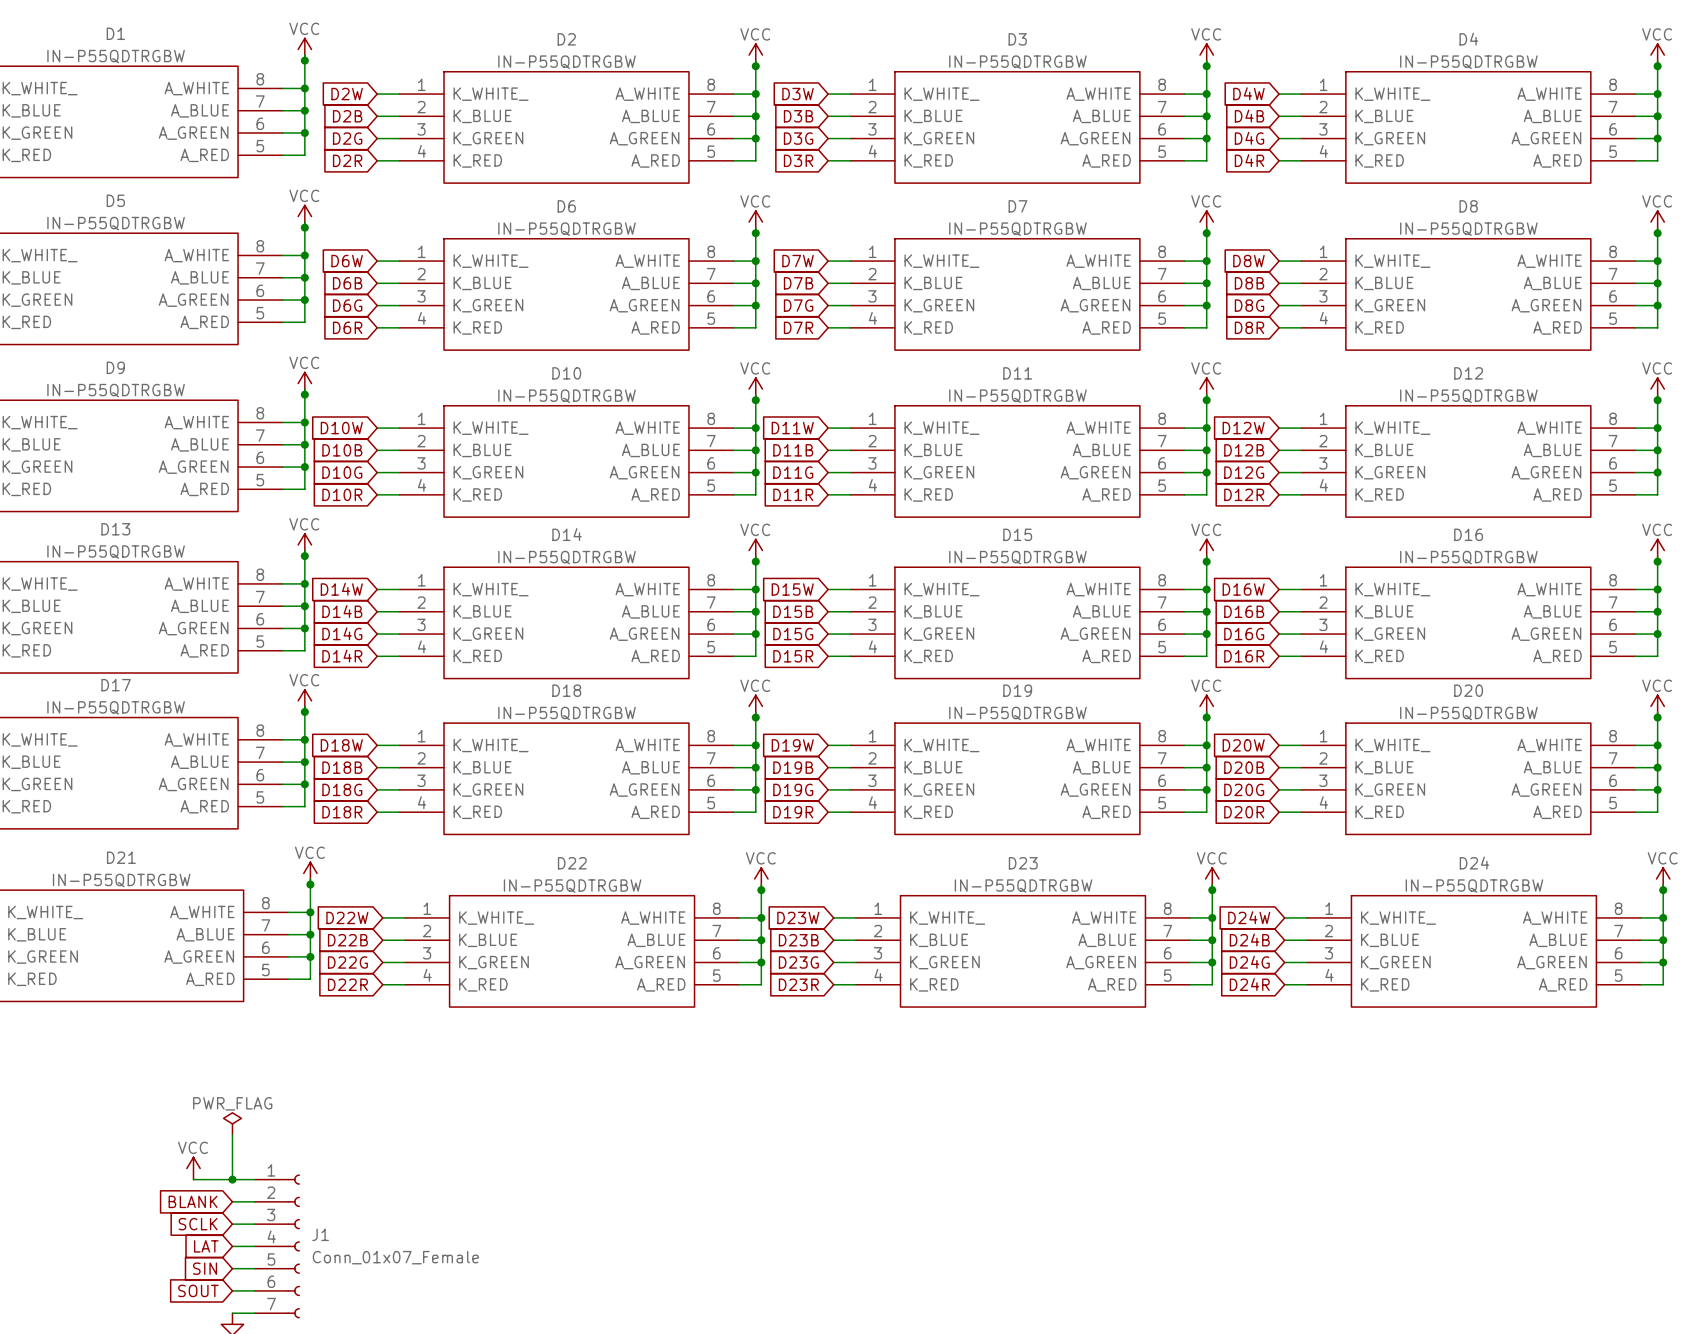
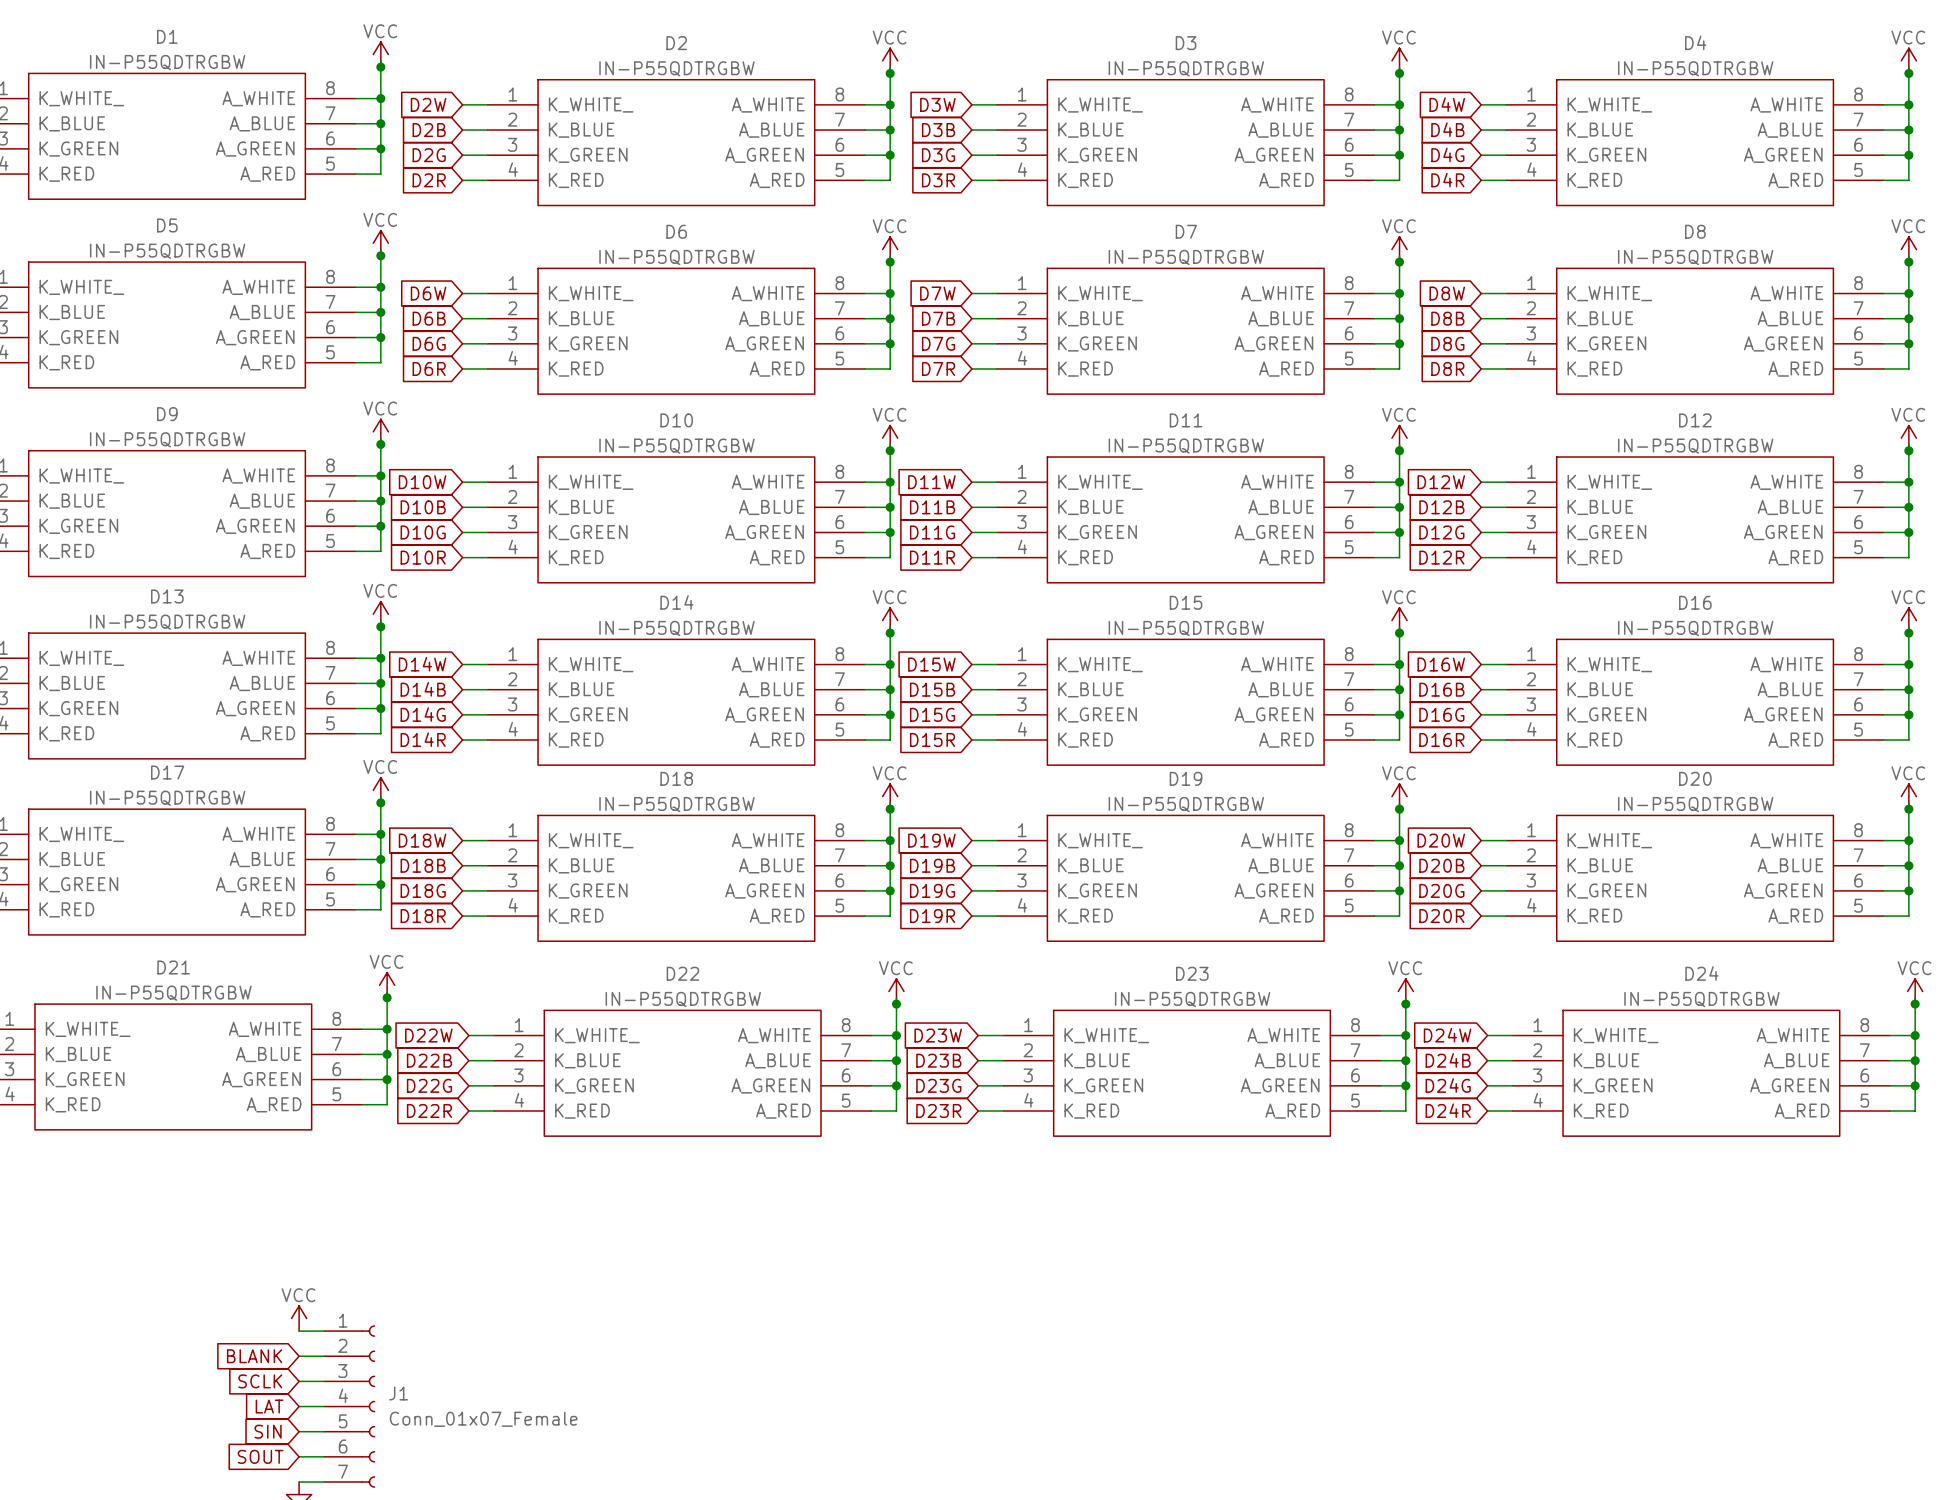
power symbol: PWR_FLAG (232, 1123) -> none
wire: (232, 1135) (232, 1179) (193, 1179) -> none
power symbol position: VCC (193, 1168) -> VCC (299, 1318)
junction: (232, 1179) -> none

